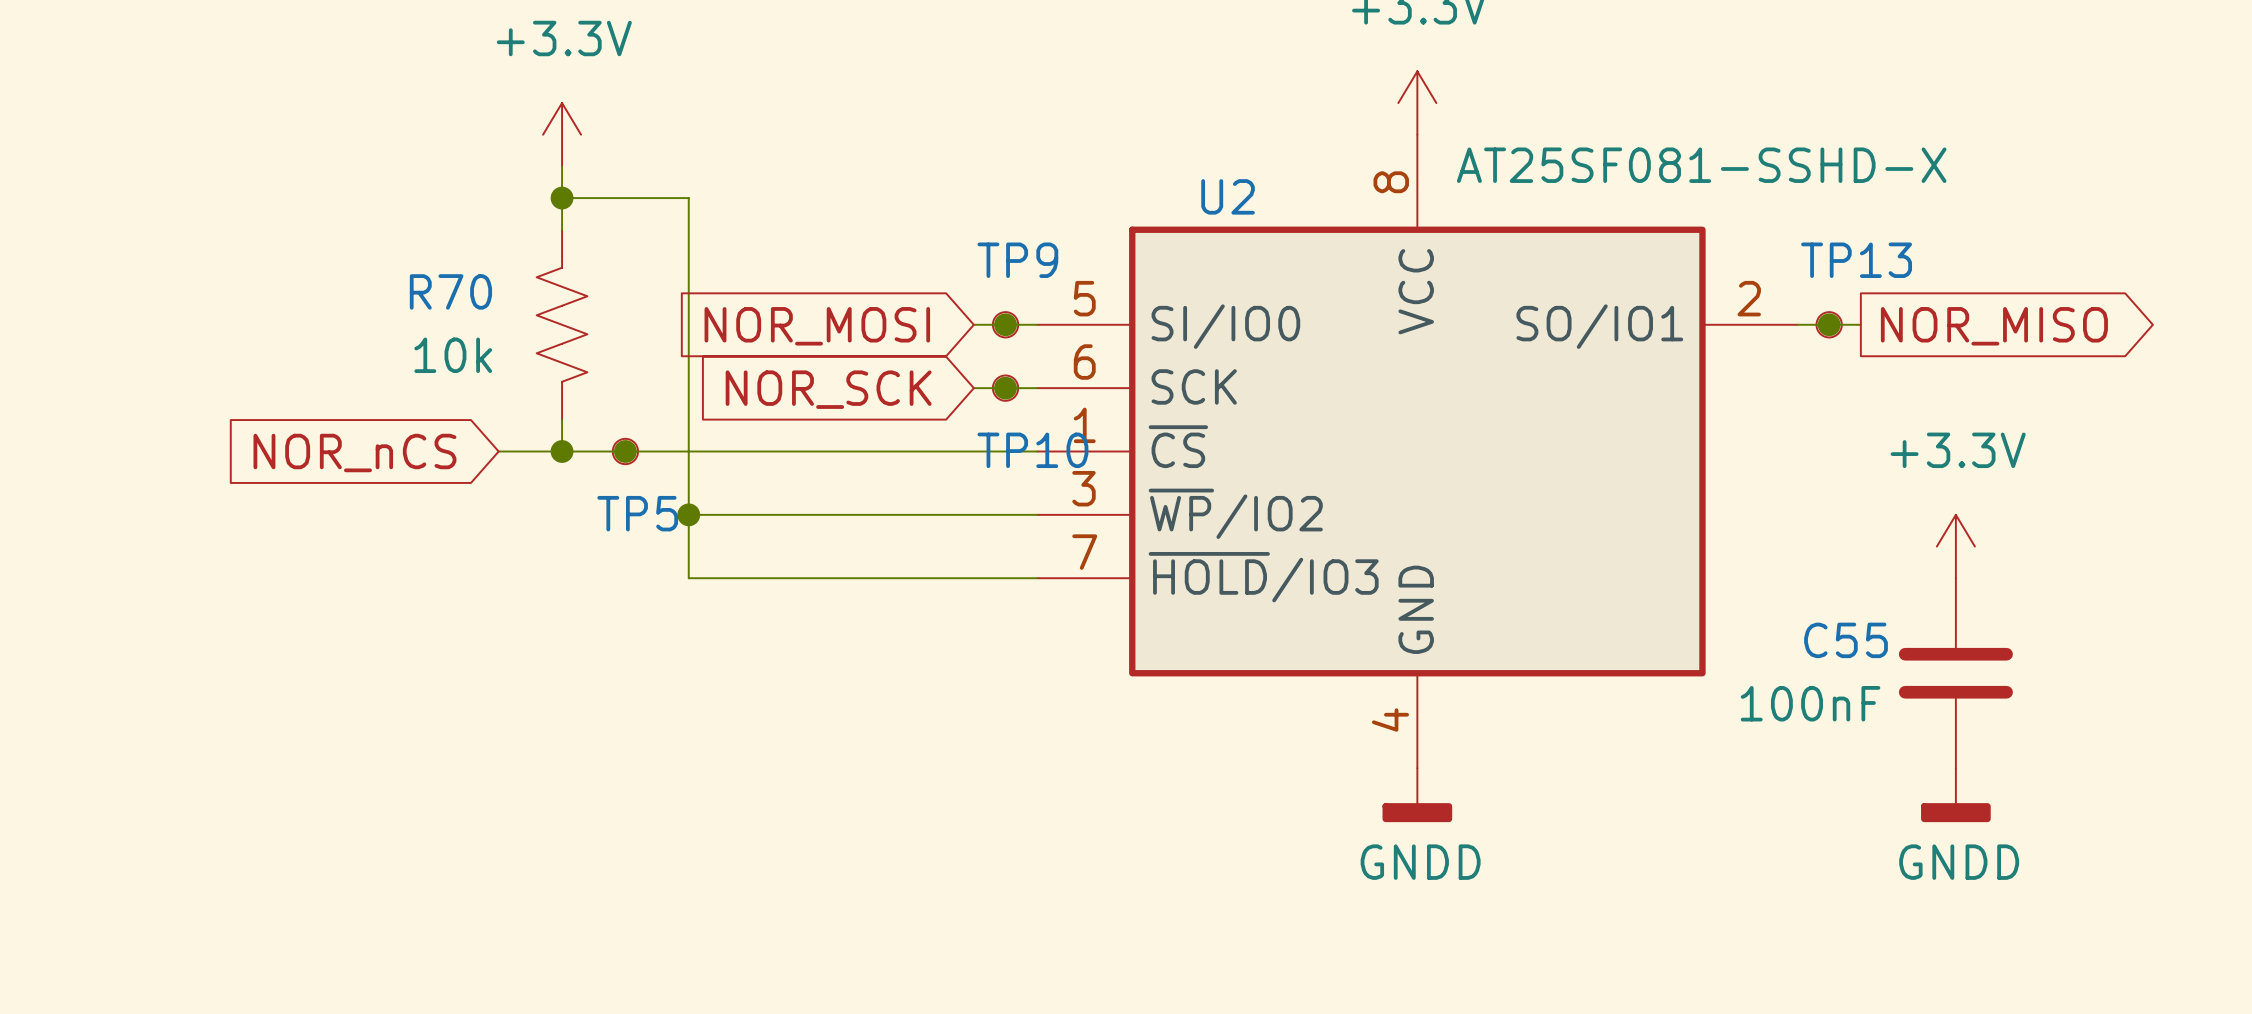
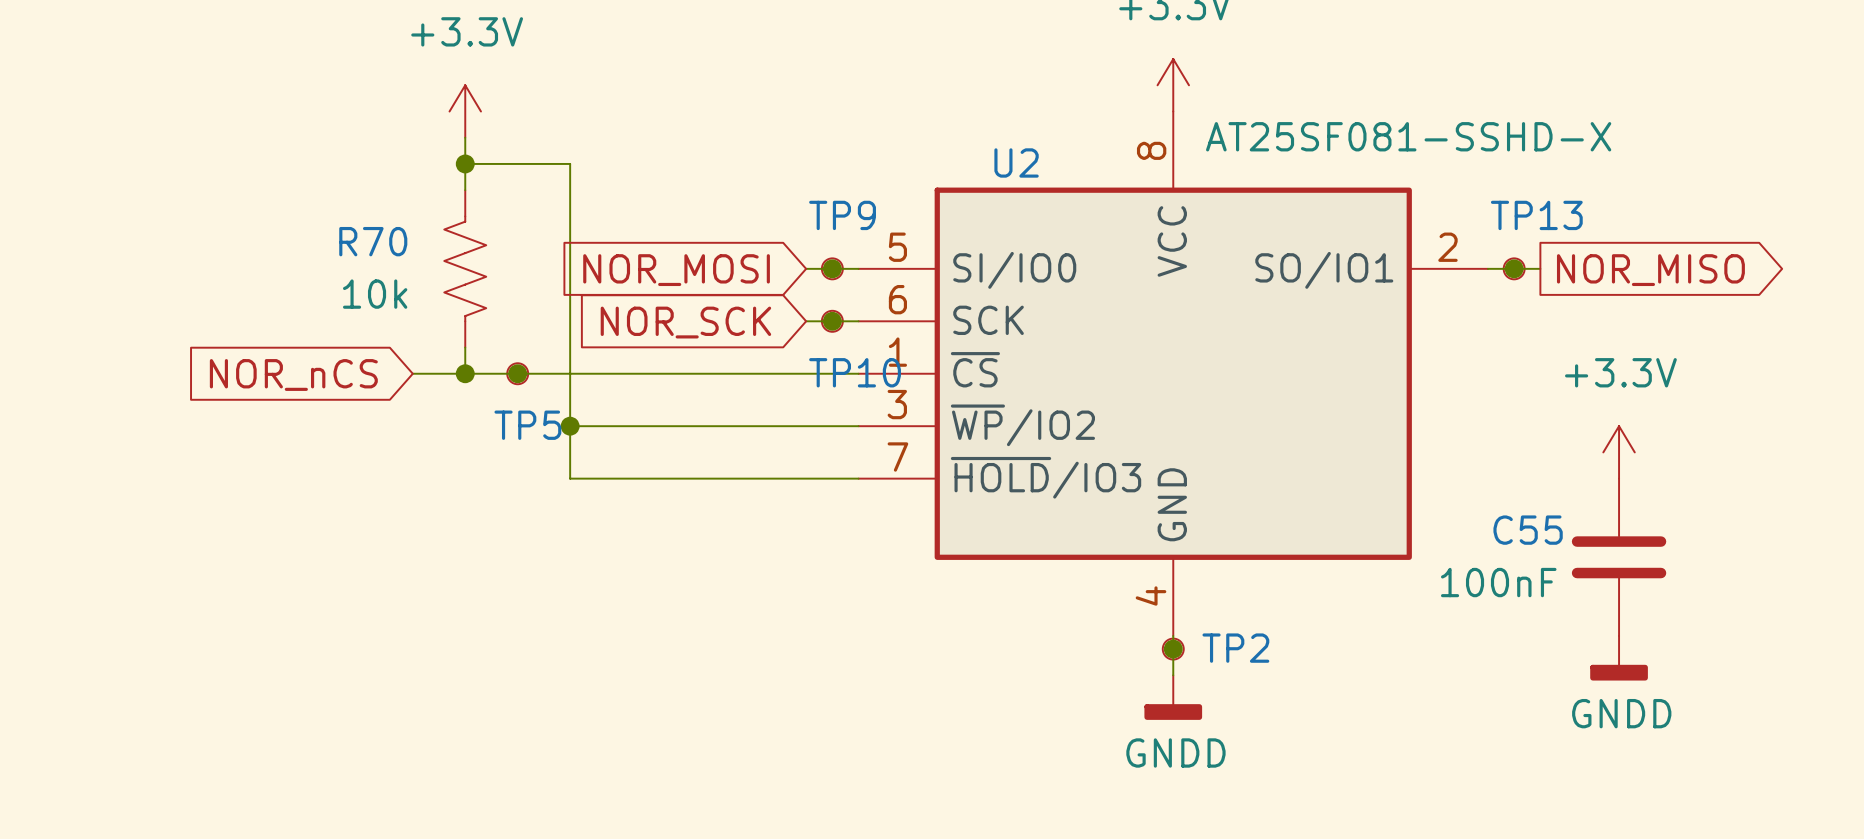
junction: none -> (1173, 649)
TP2: none -> (1173, 649)
power symbol position: GNDD (1417, 795) -> GNDD (1173, 697)

